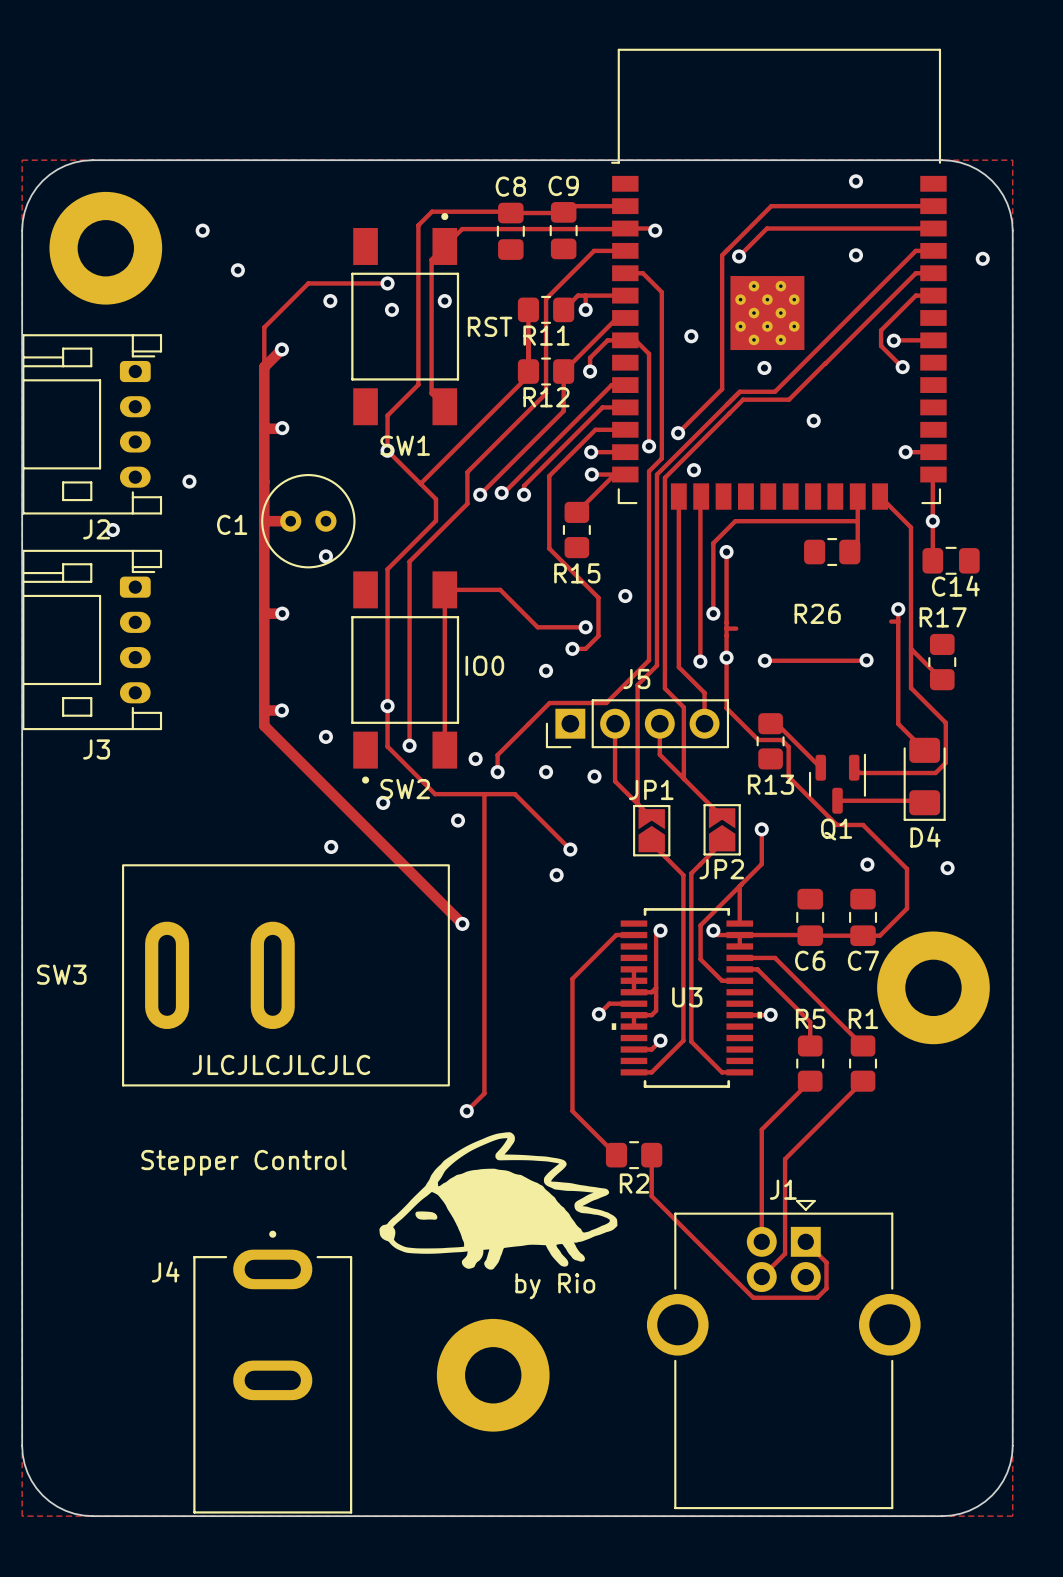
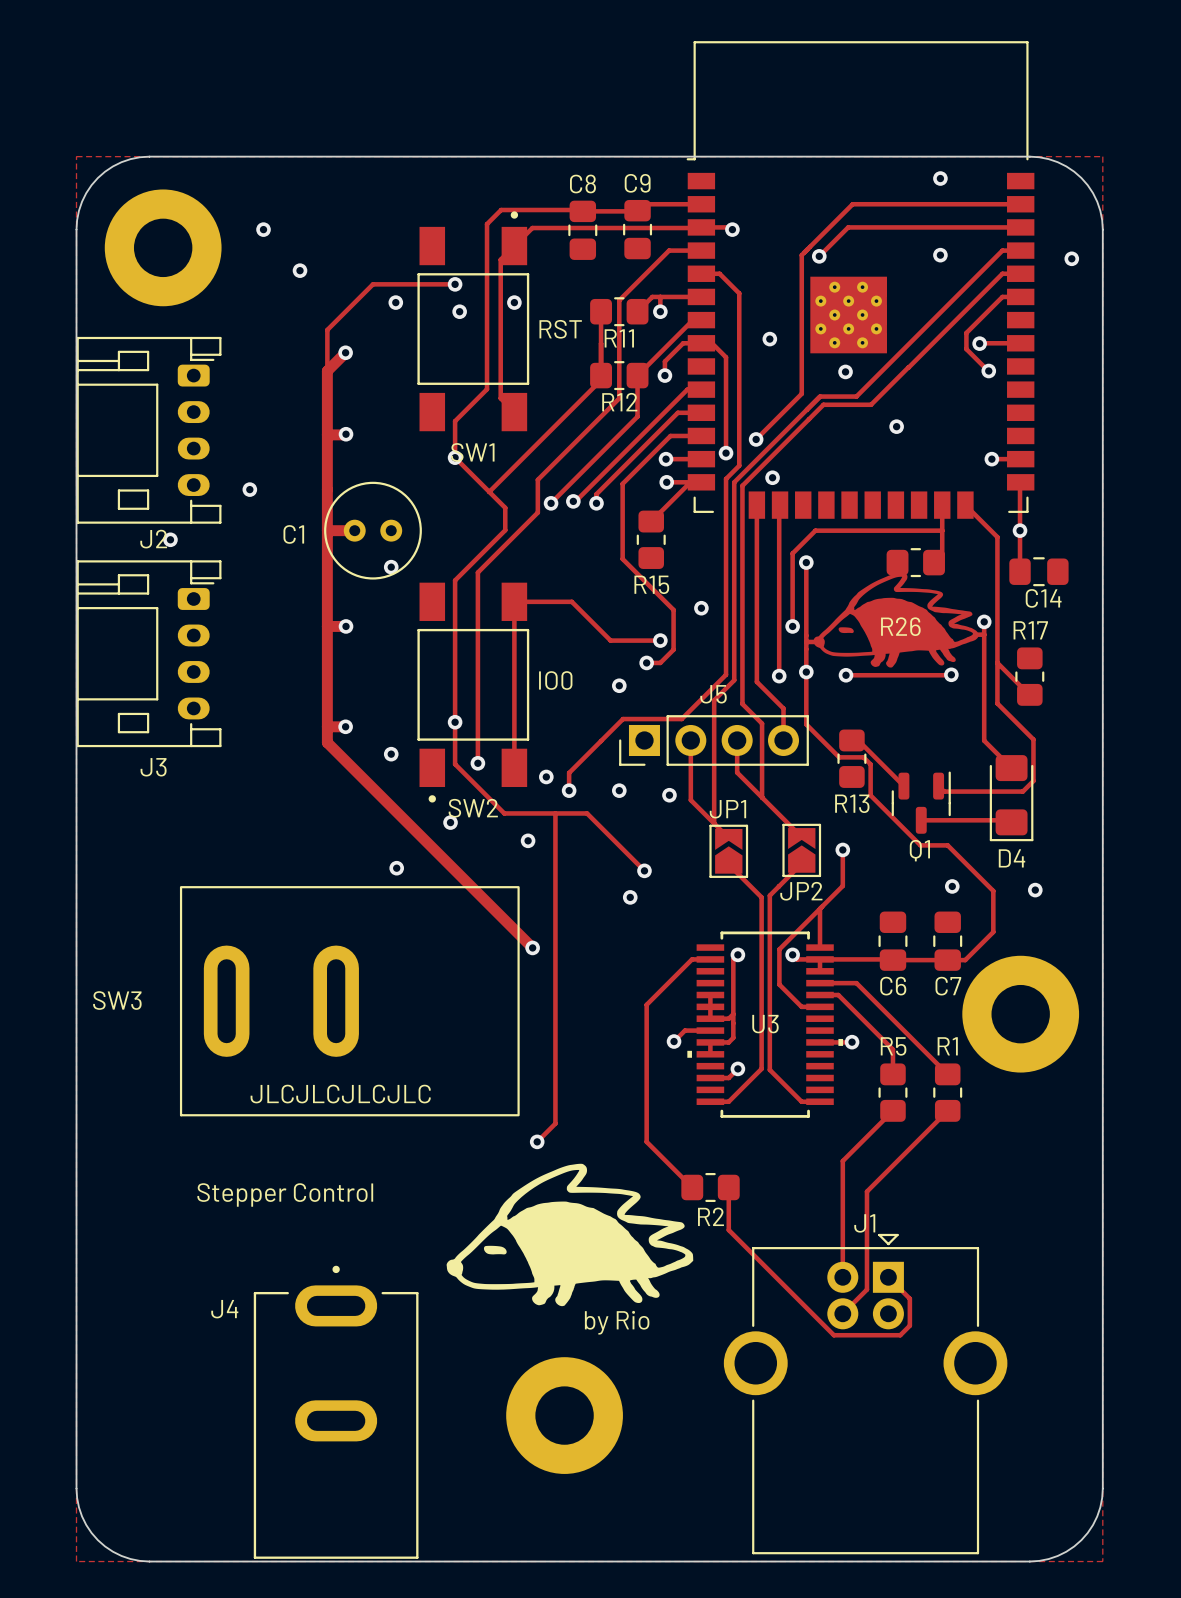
part: none -> (895, 620)

